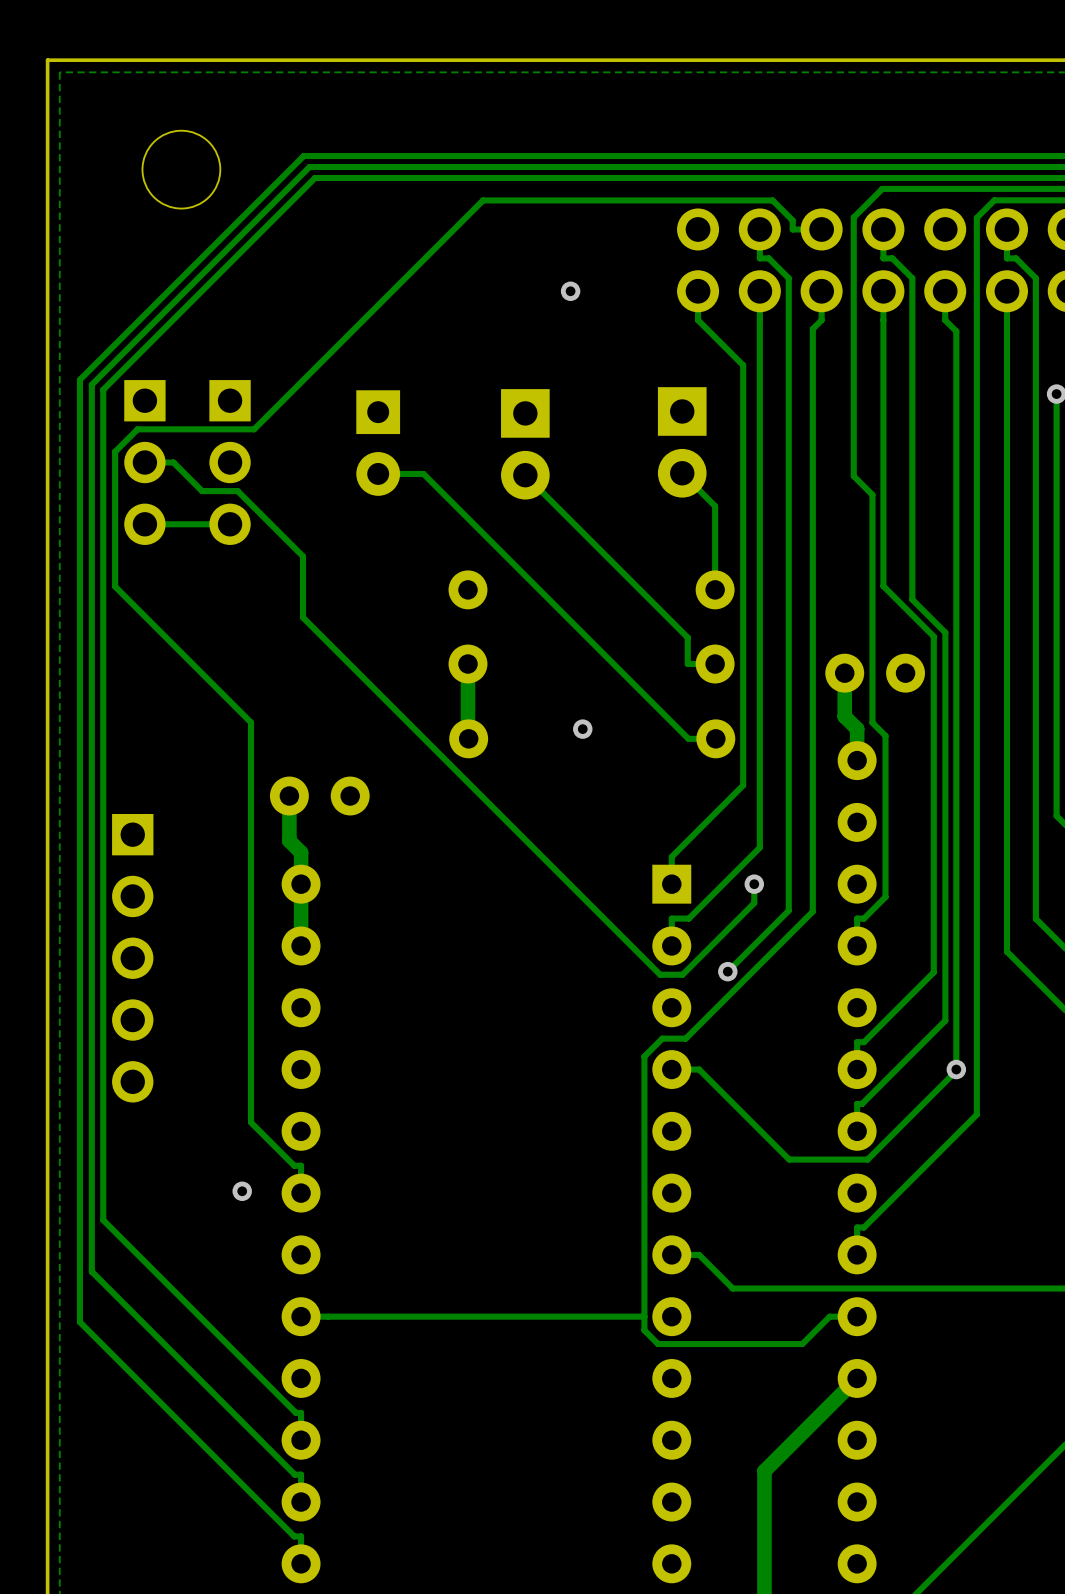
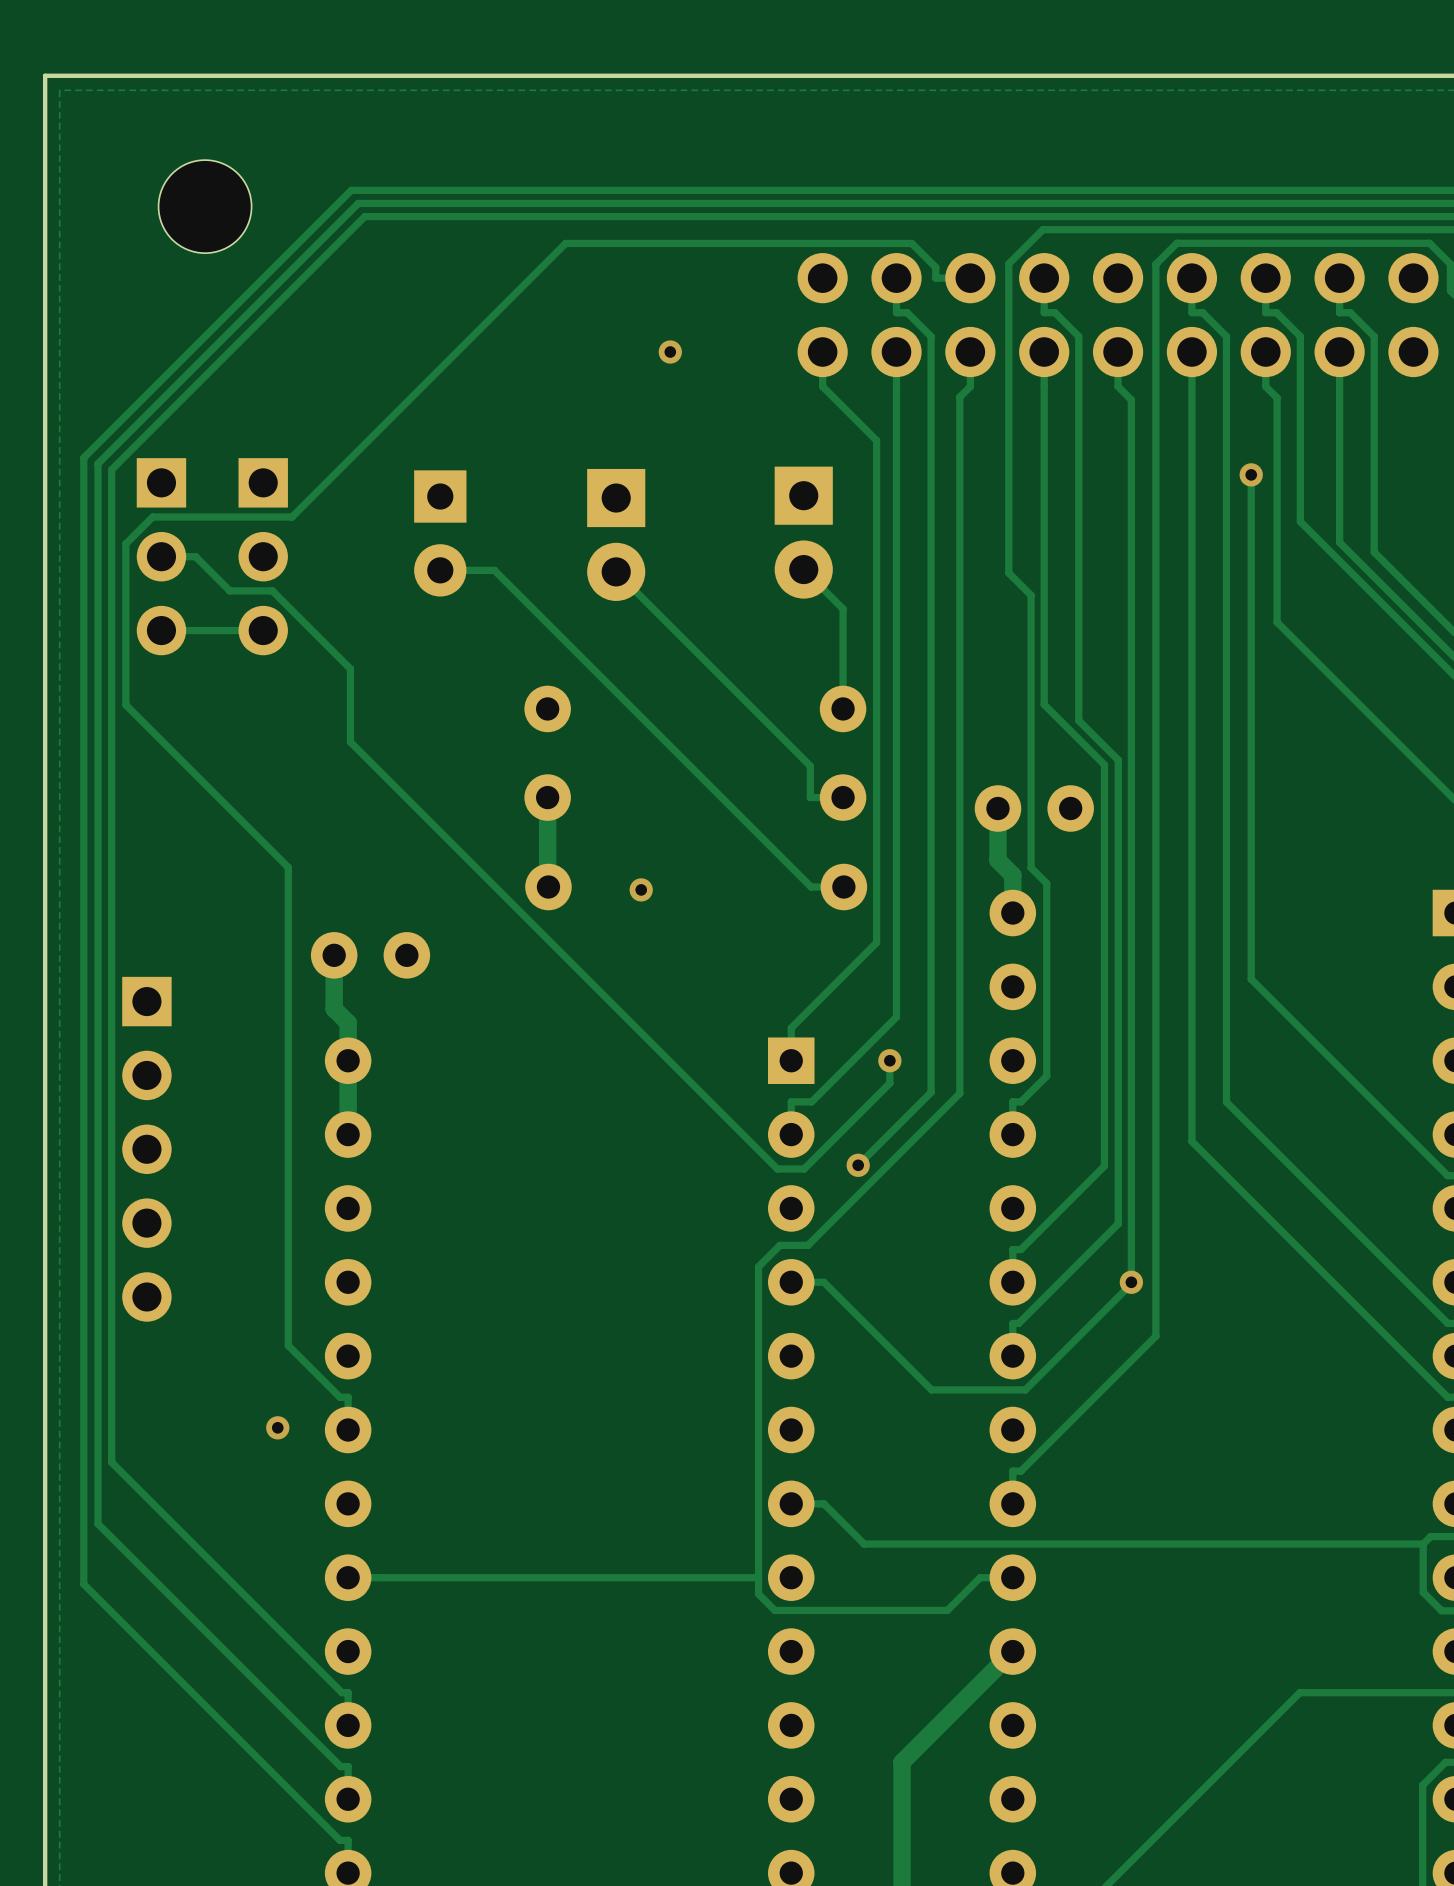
via position: (582, 729) -> (641, 889)

